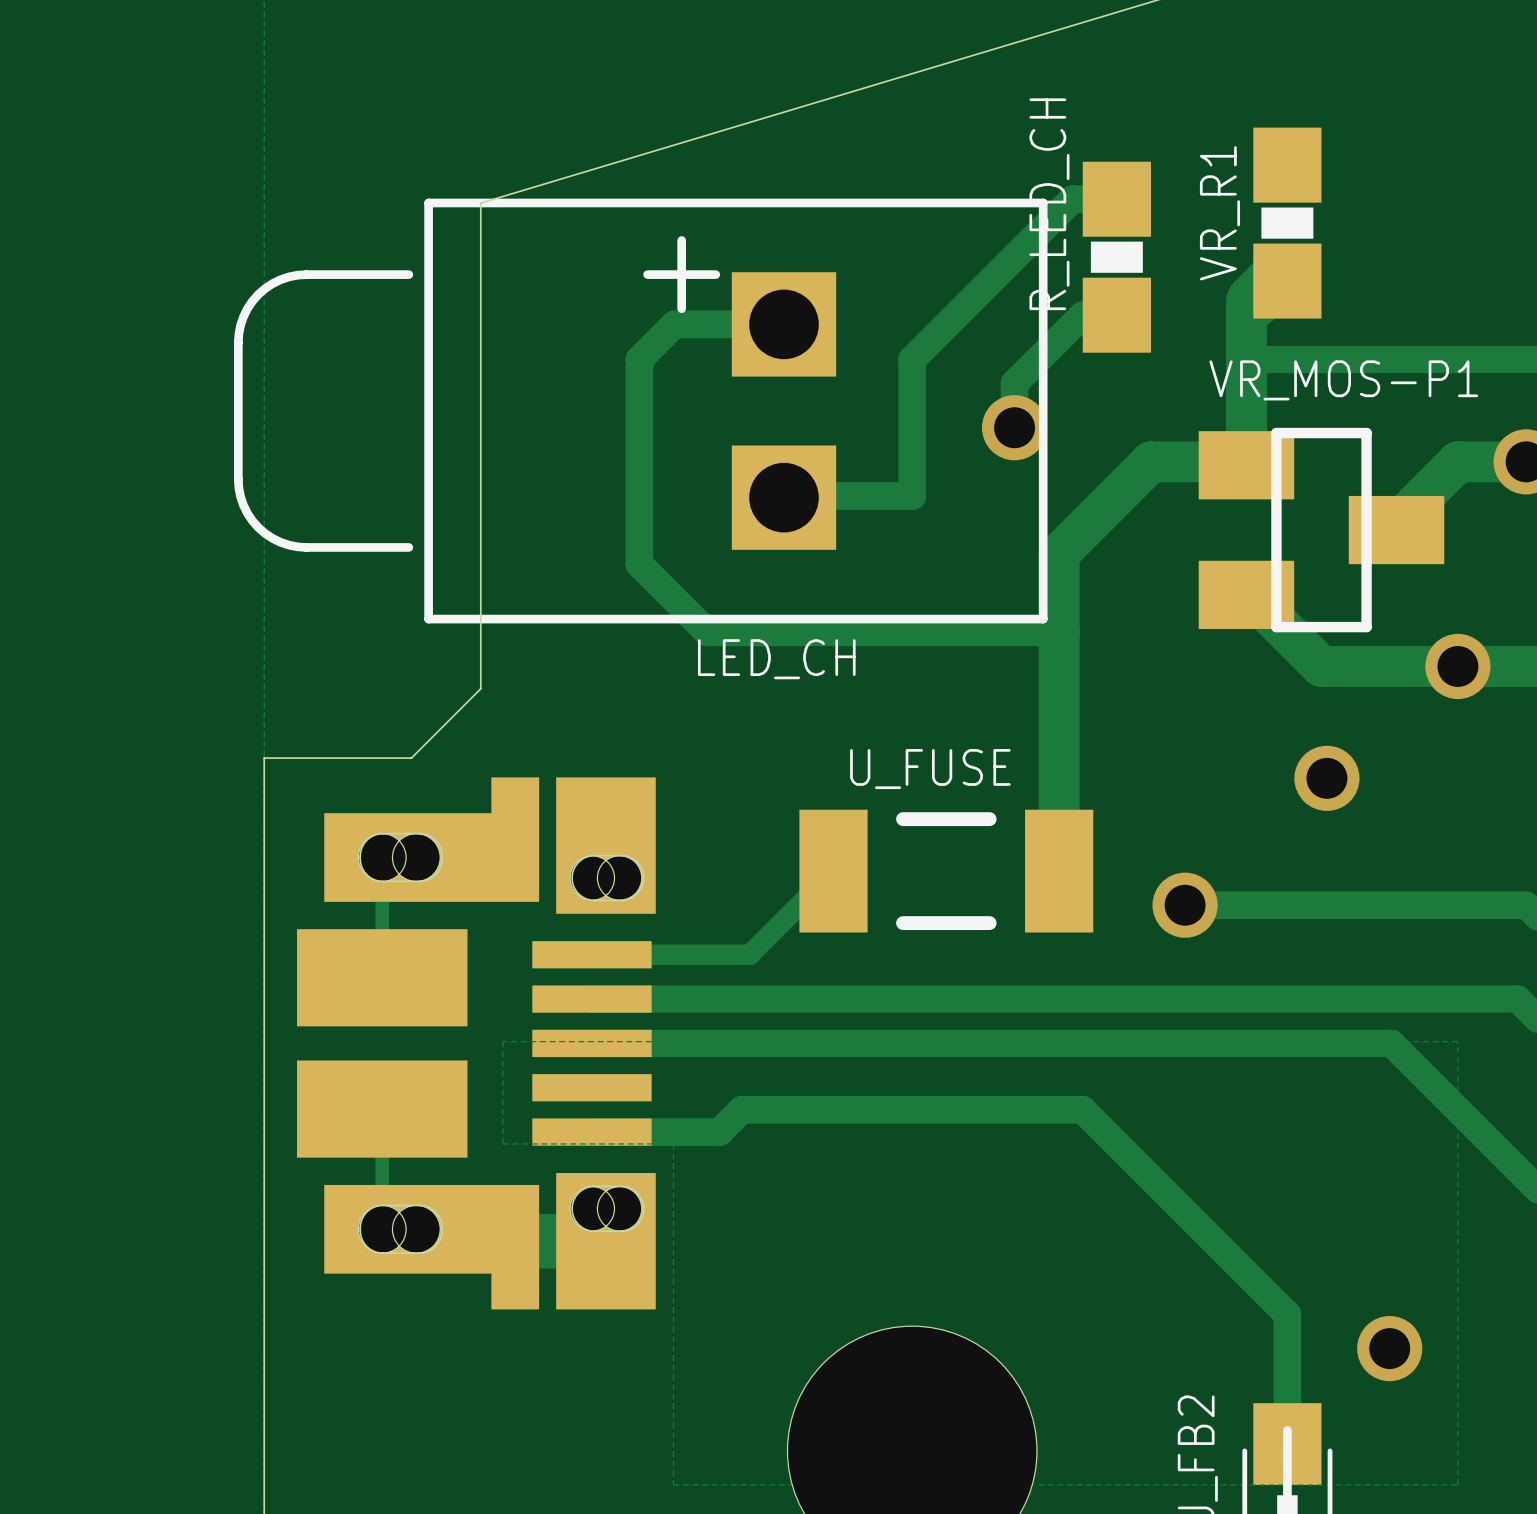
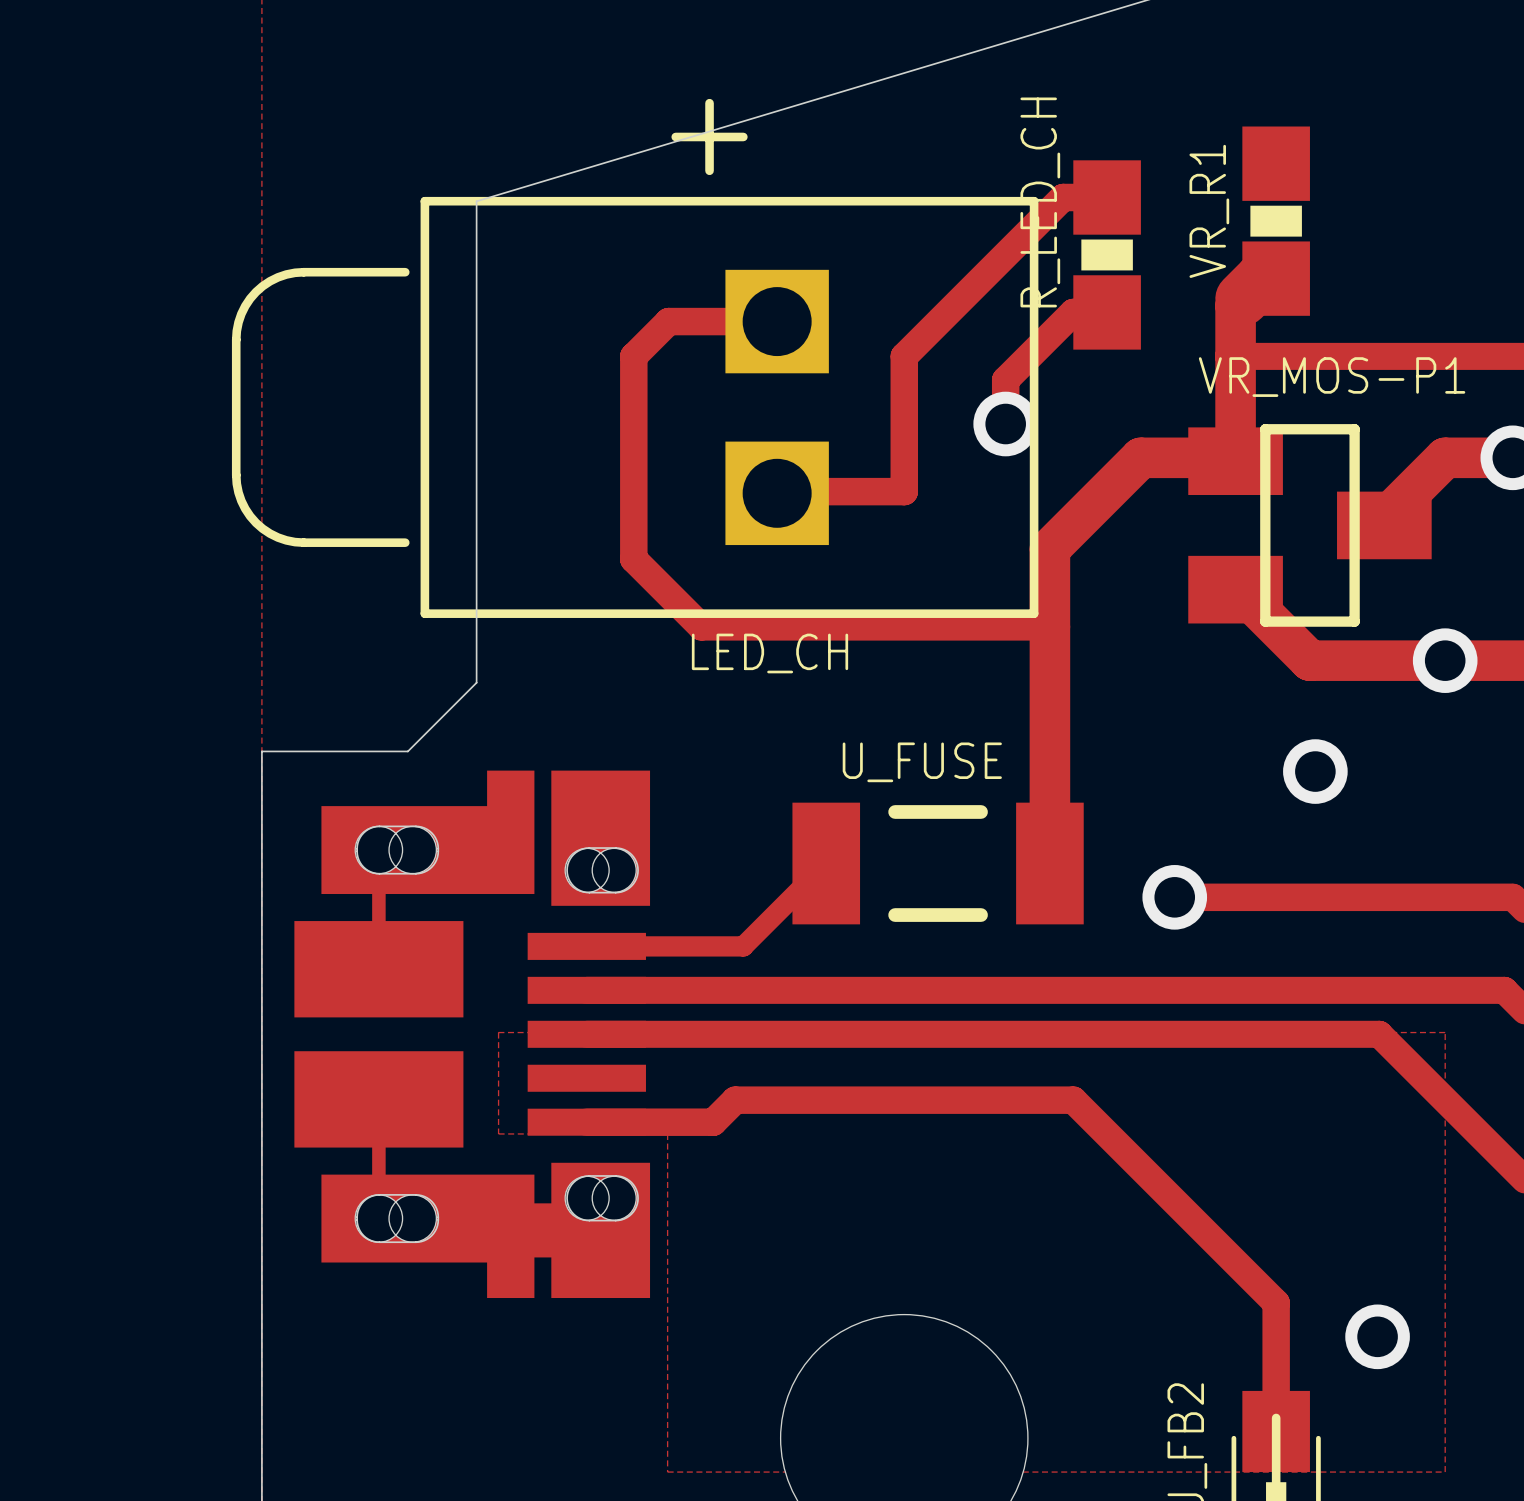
LED_CH footprint: [233, 198, 1048, 624] -> [231, 98, 1039, 618]

